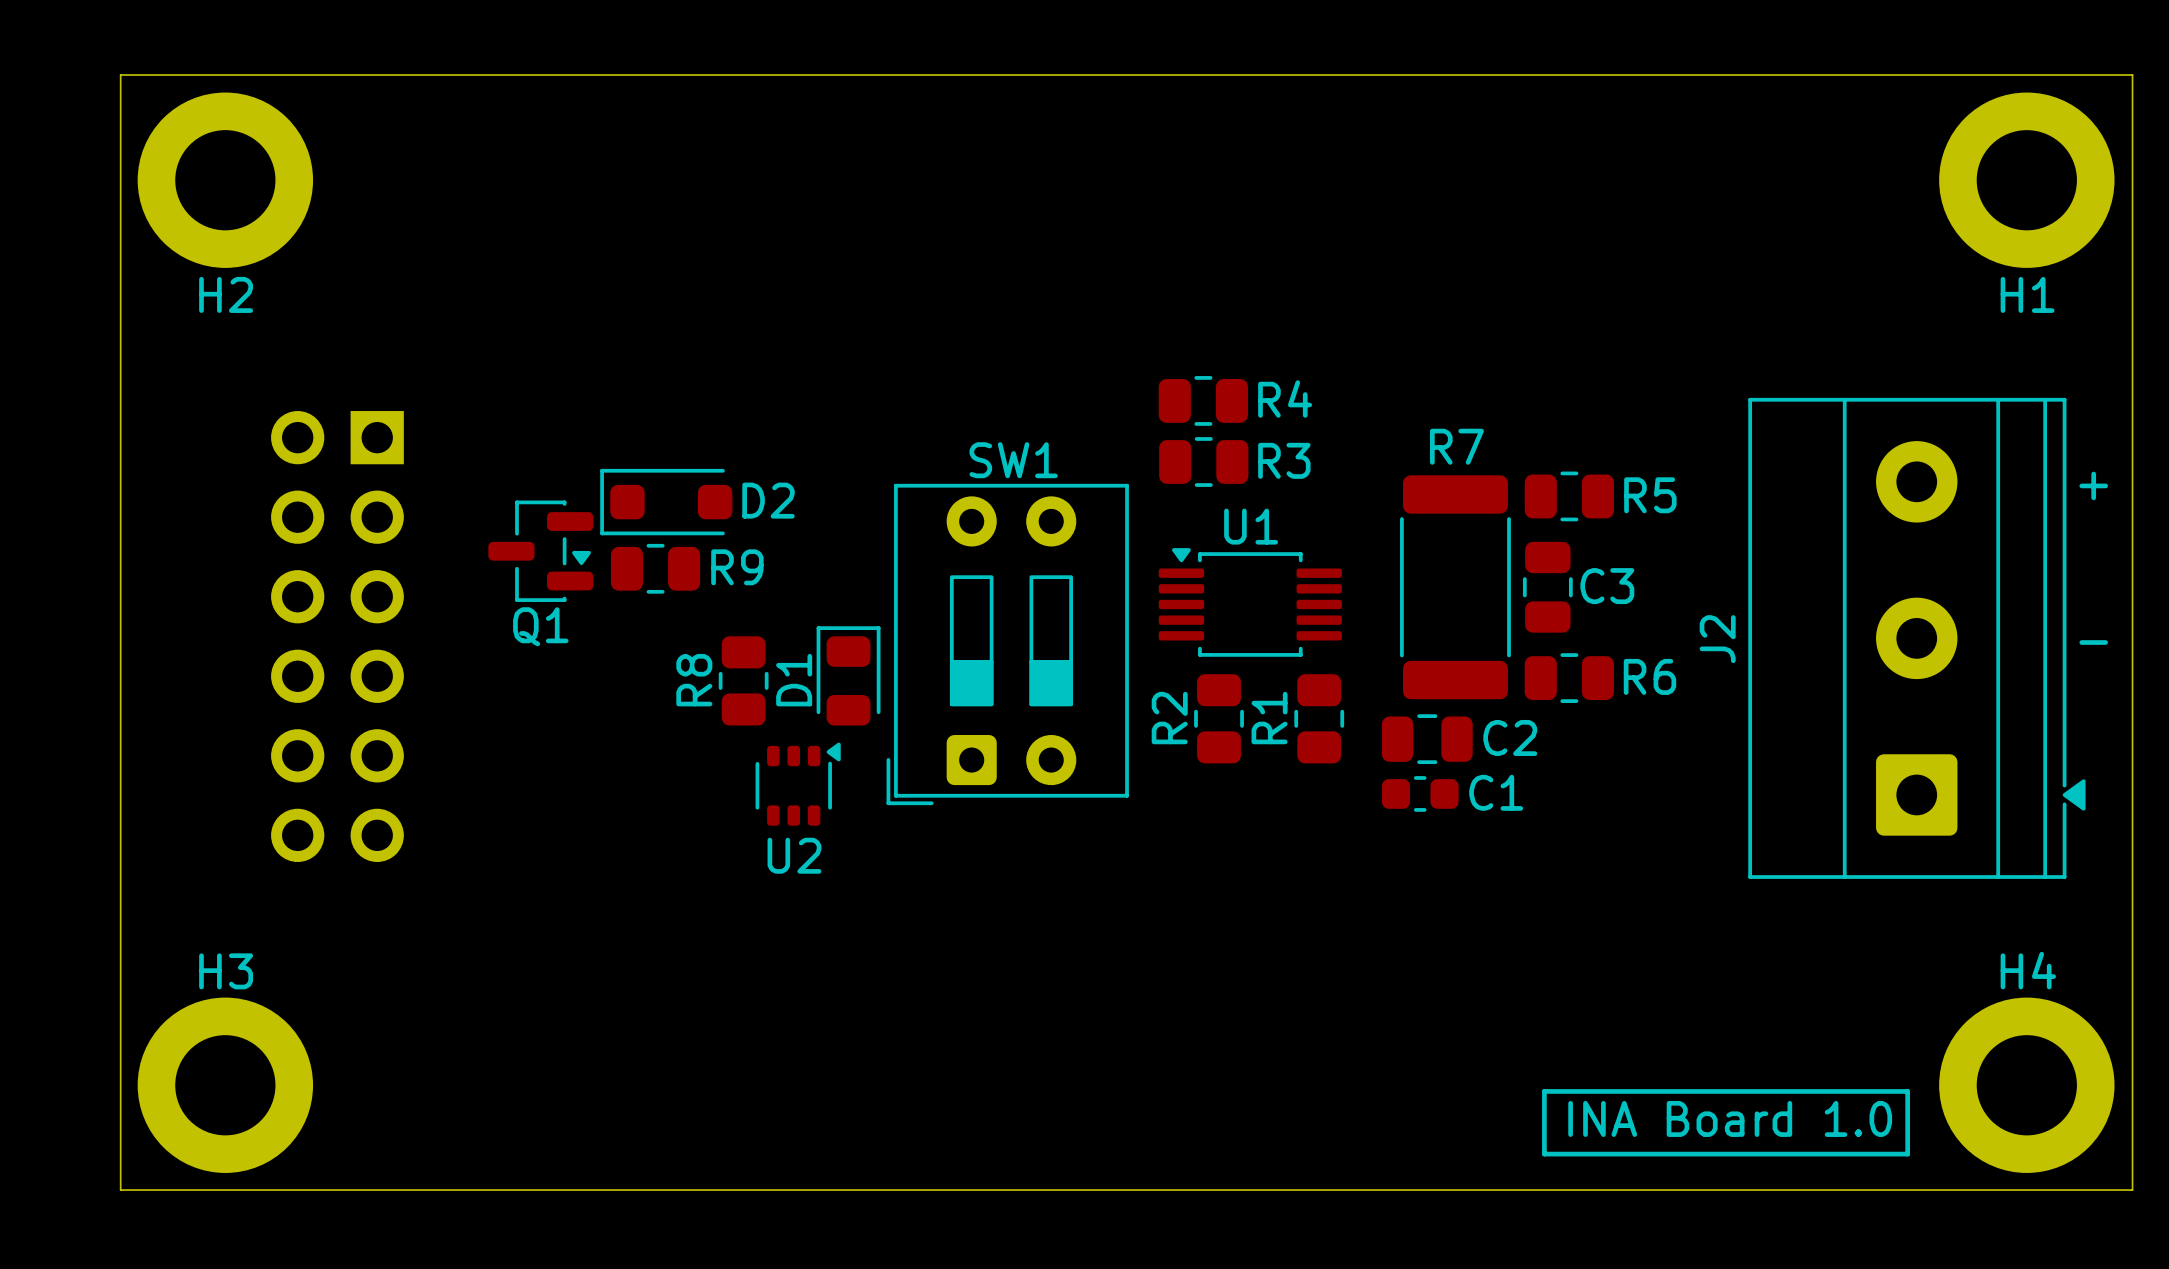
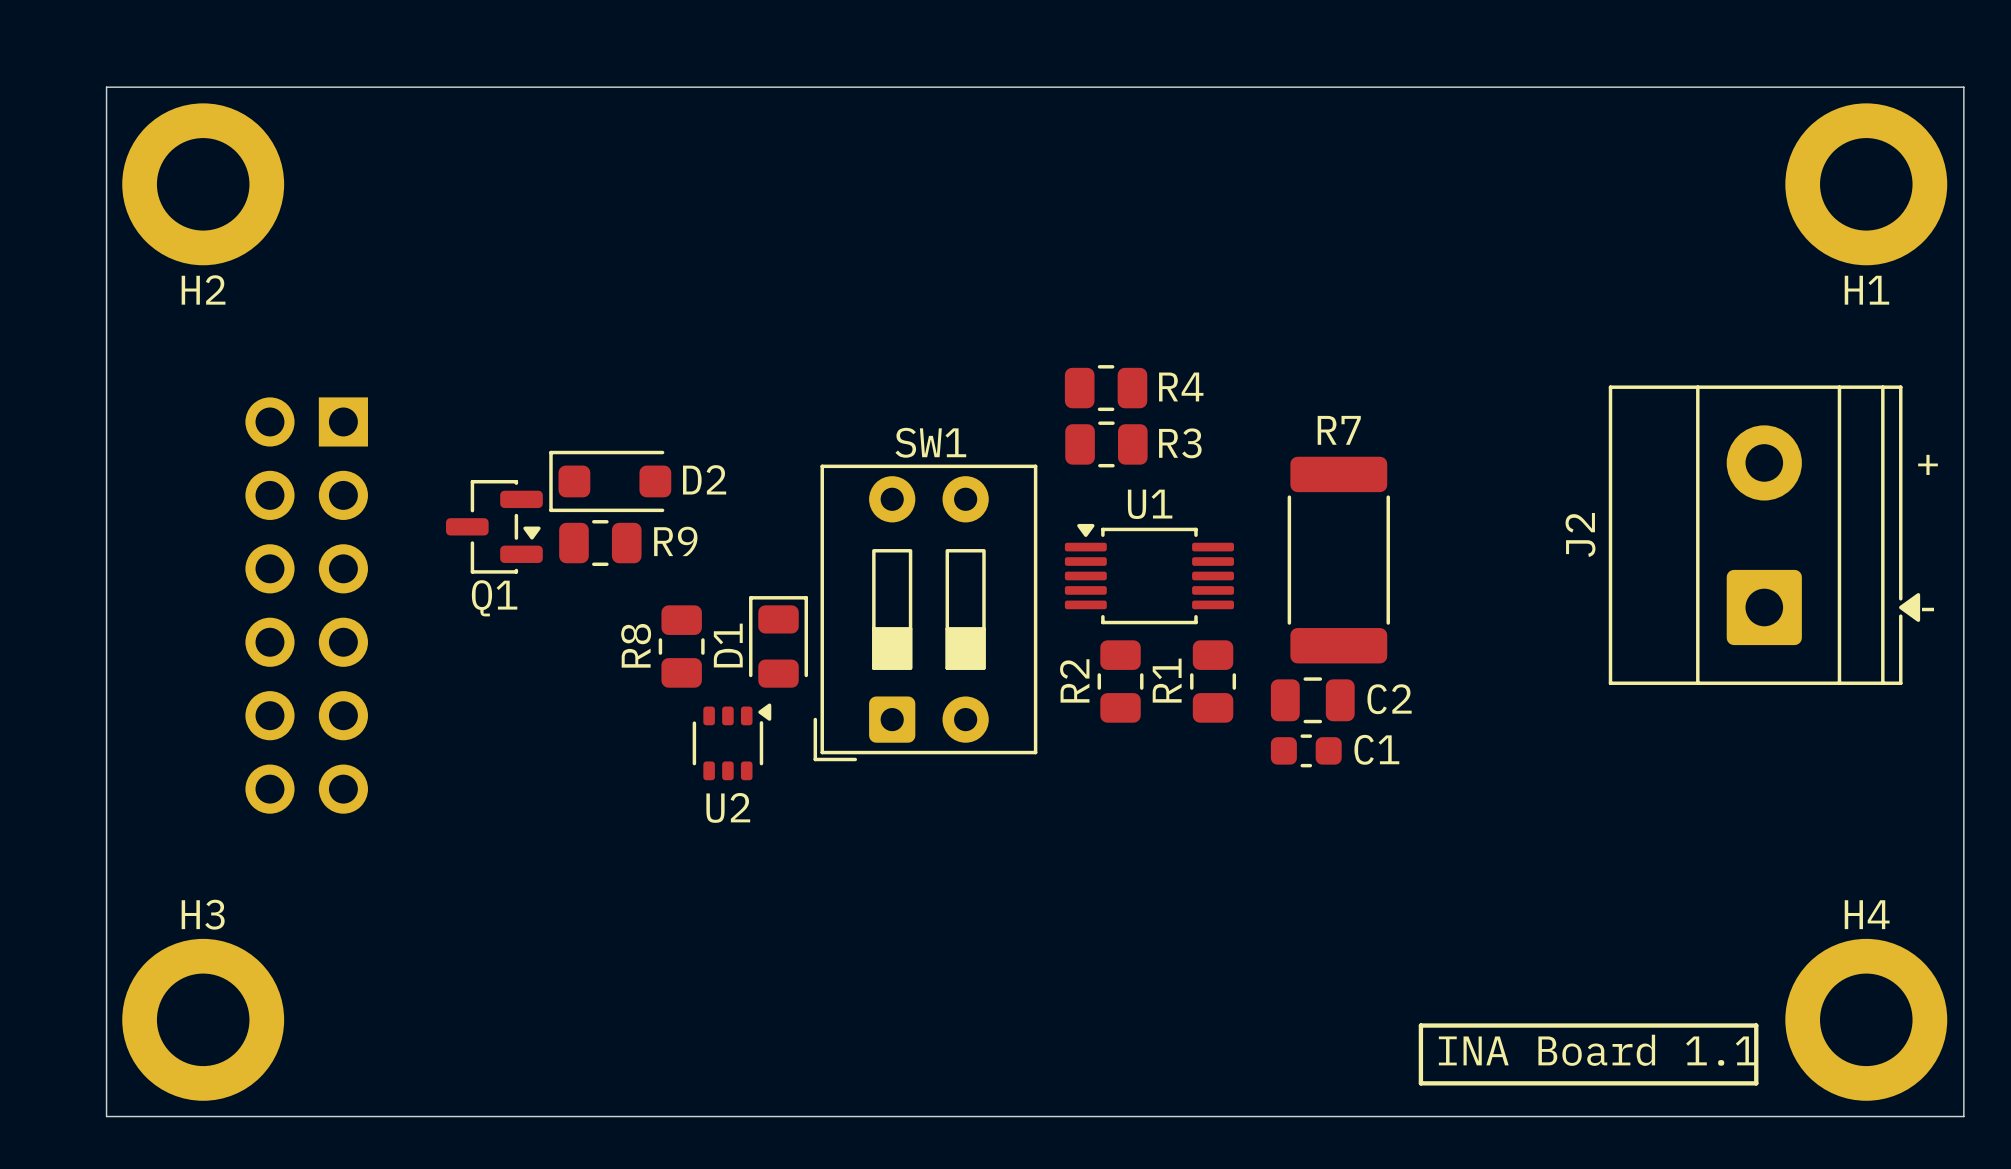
J2 footprint: [1748, 397, 2086, 879] -> [1608, 385, 1921, 685]
R5: (1569, 496) -> none
C3: (1547, 587) -> none
R6: (1569, 678) -> none
text: INA Board 1.0 (1730, 1118) -> INA Board 1.1 (1597, 1050)

